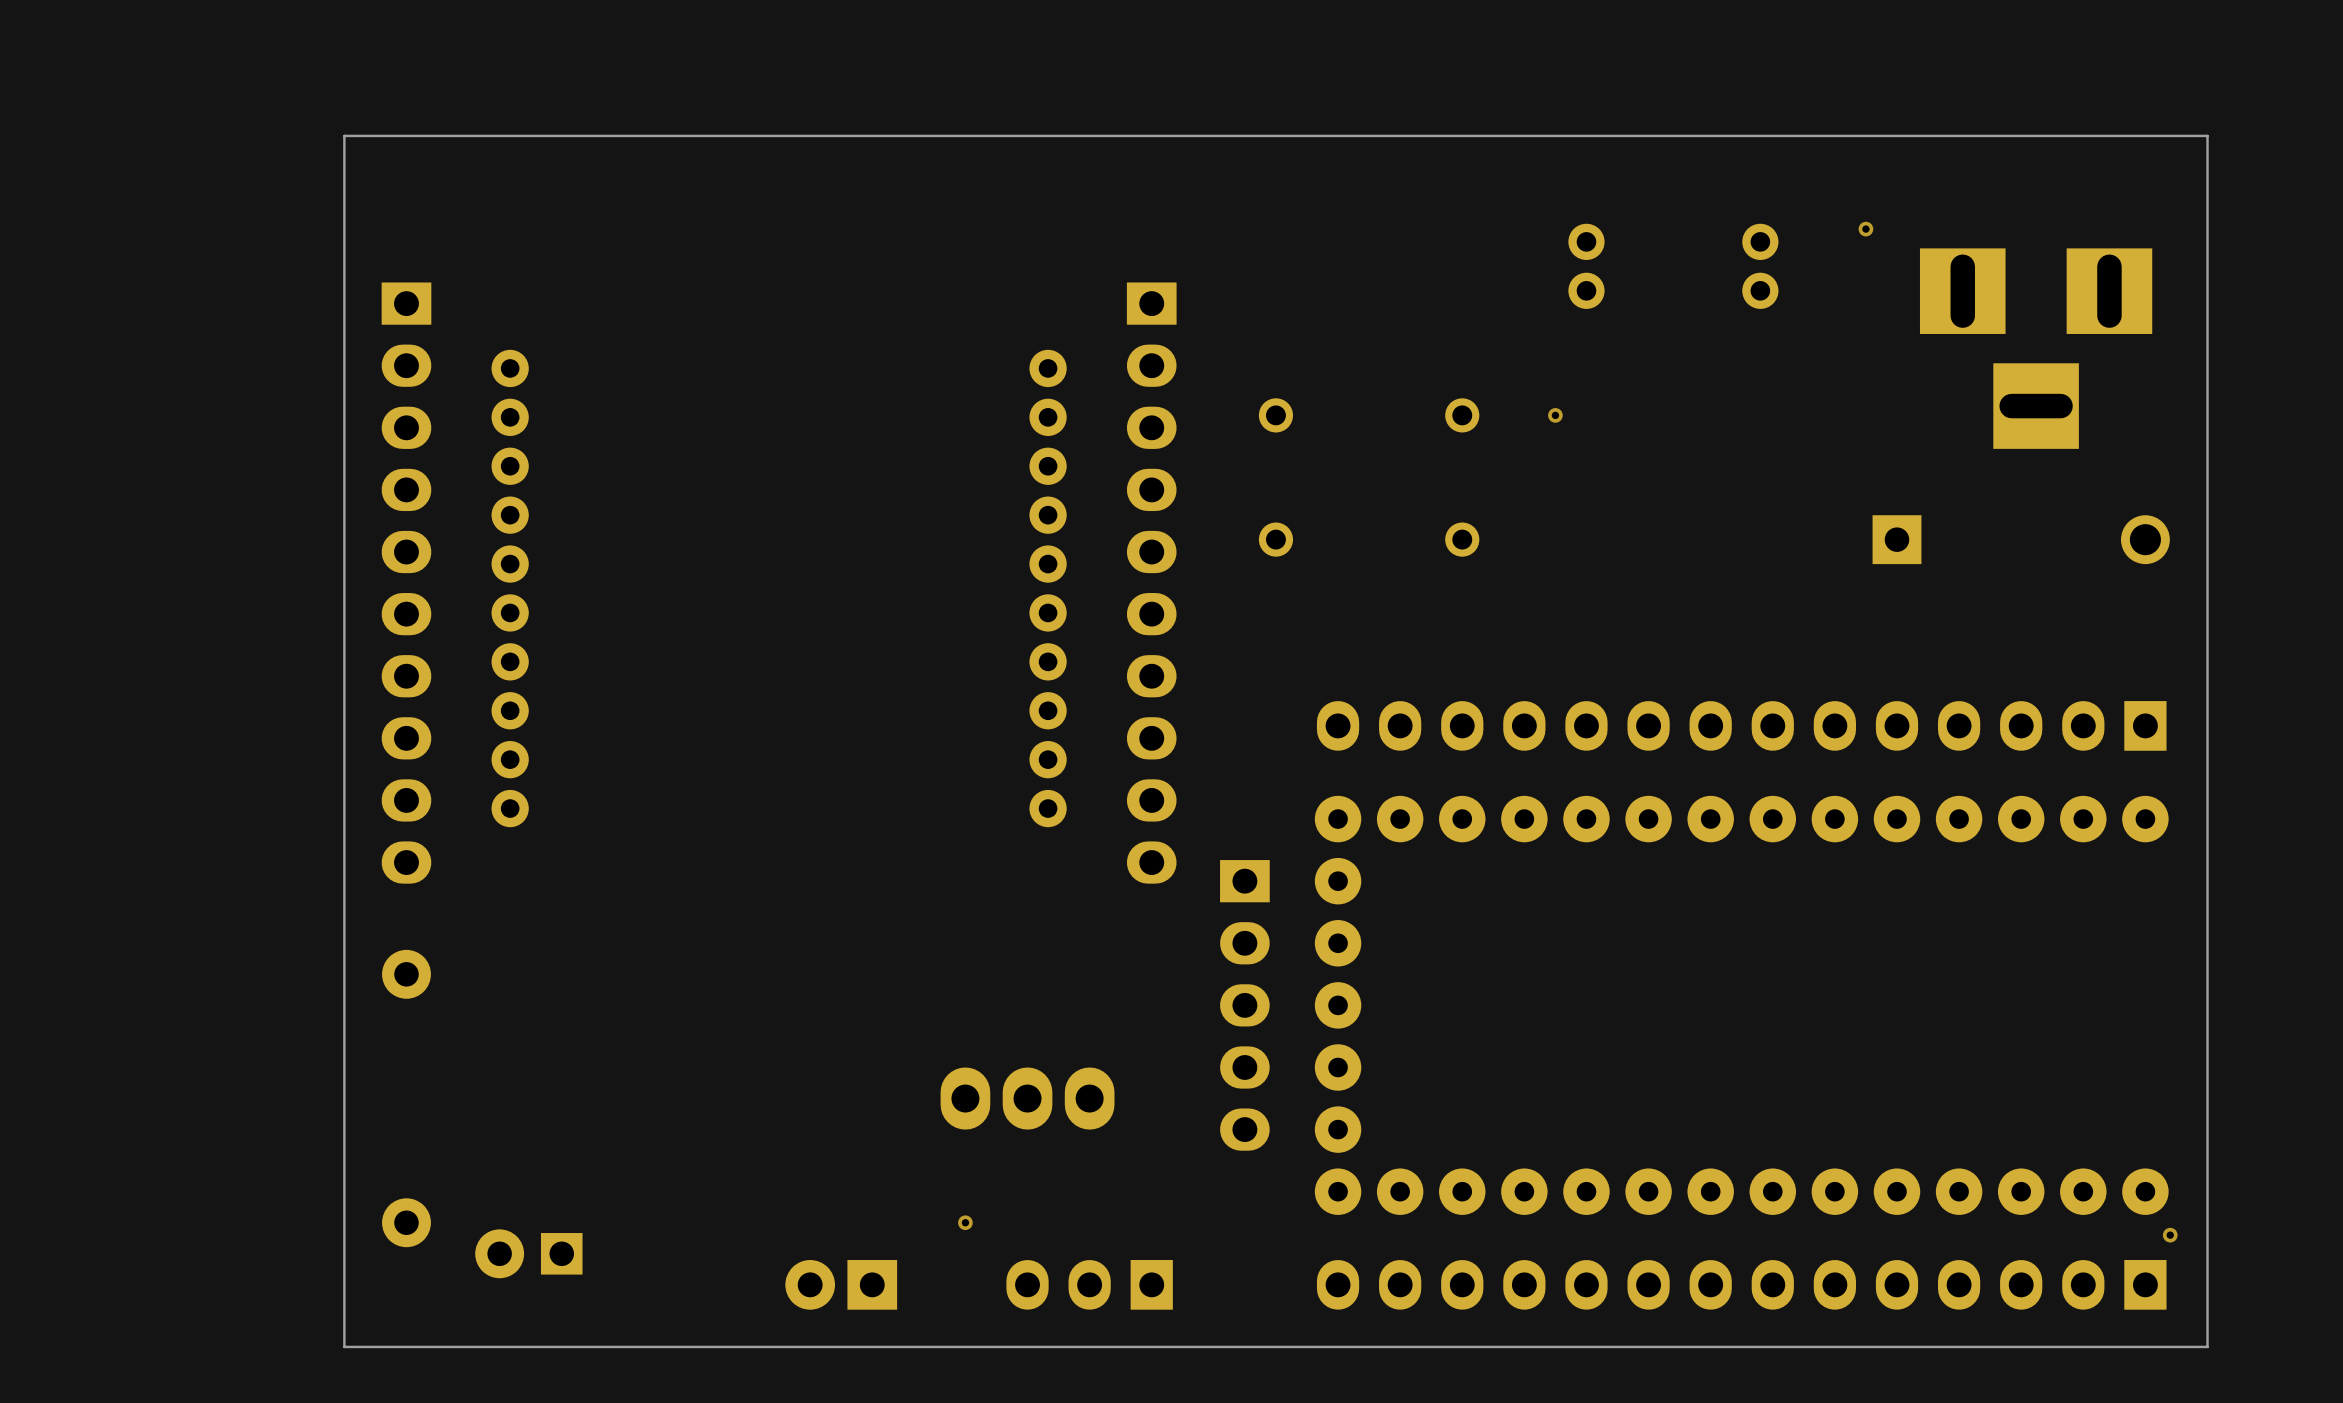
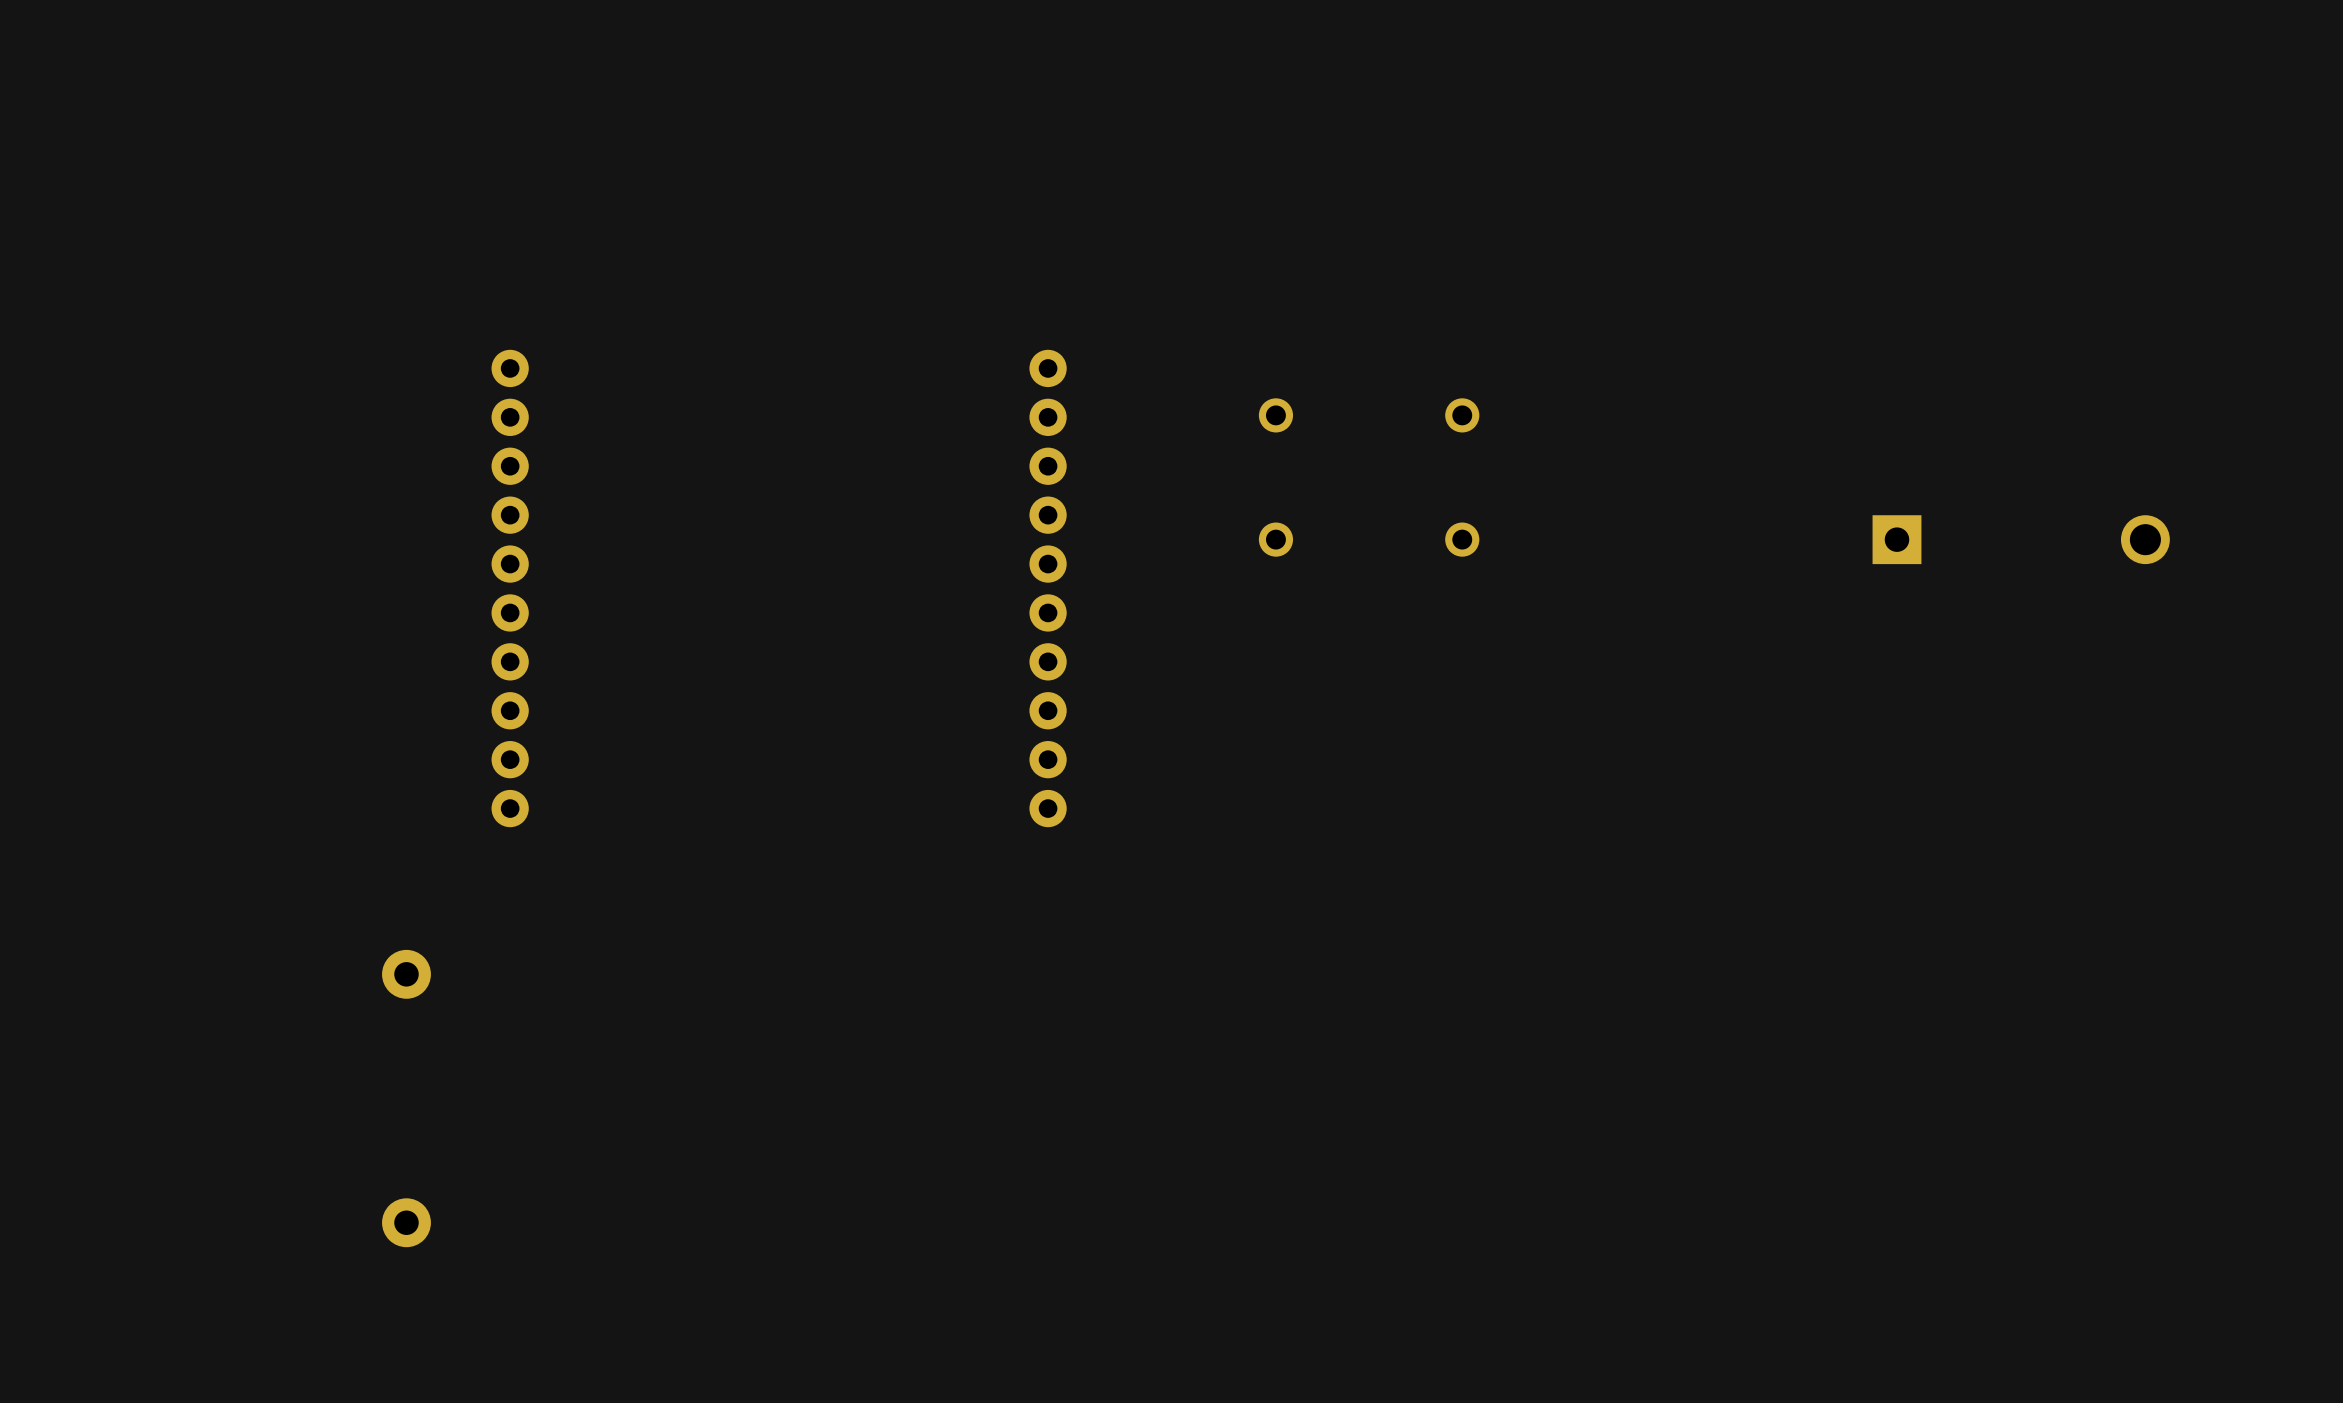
board edge: (2207, 135) (344, 135) (344, 1346) (2207, 1346) (2207, 135) -> none
via: (1865, 229) -> none
part: (1586, 266) -> none
part: (1760, 266) -> none
part: (2036, 348) -> none
via: (1555, 415) -> none
part: (406, 583) -> none
part: (1151, 583) -> none
part: (1741, 725) -> none
part: (1244, 1005) -> none
part: (1741, 1005) -> none
part: (1027, 1098) -> none
via: (965, 1222) -> none
via: (2170, 1235) -> none
part: (528, 1253) -> none
part: (841, 1284) -> none
part: (1089, 1284) -> none
part: (1741, 1284) -> none

